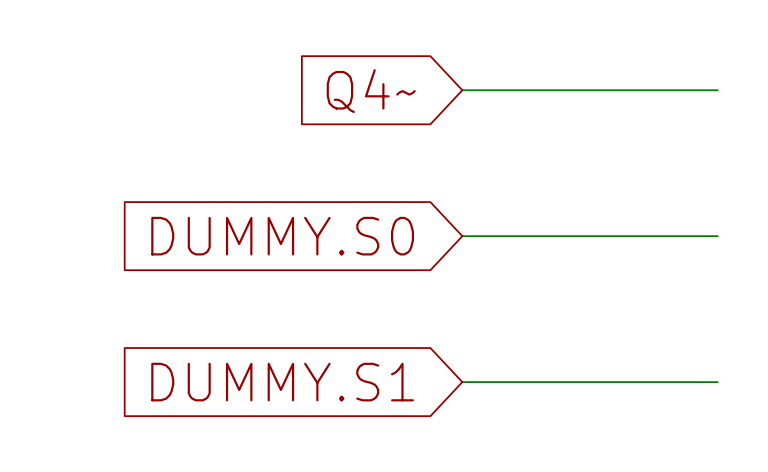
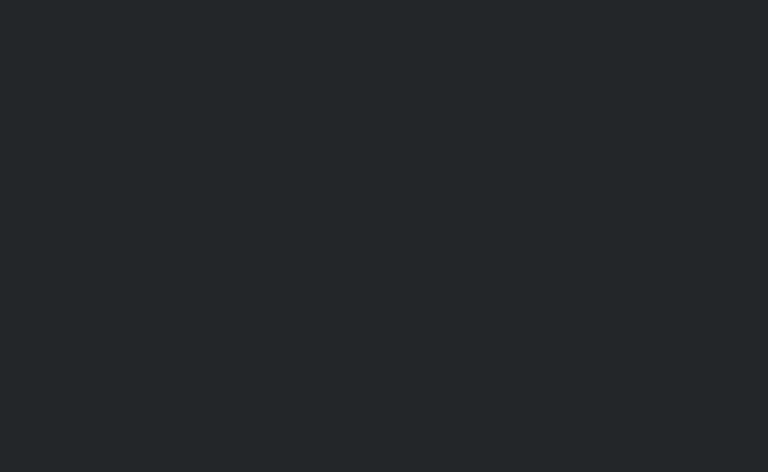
wire: (462, 90) (717, 90) -> none
global label: Q4~ (371, 91) -> none
global label: DUMMY.S0 (282, 236) -> none
wire: (462, 236) (717, 236) -> none
global label: DUMMY.S1 (282, 382) -> none
wire: (462, 382) (717, 382) -> none

